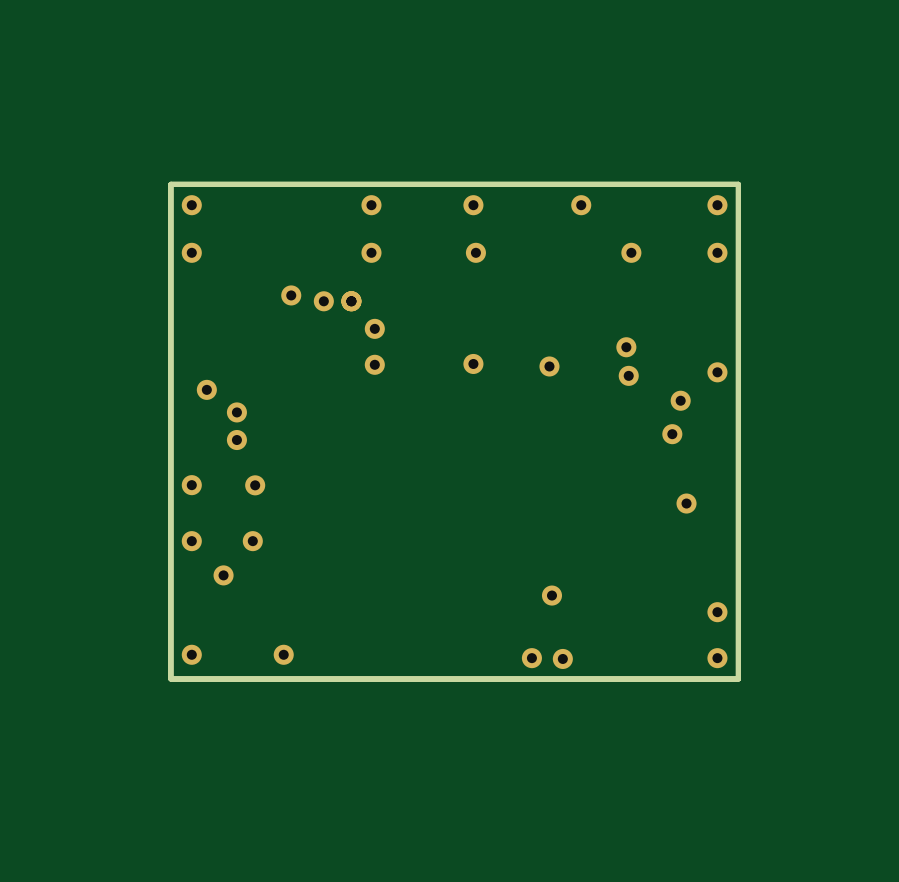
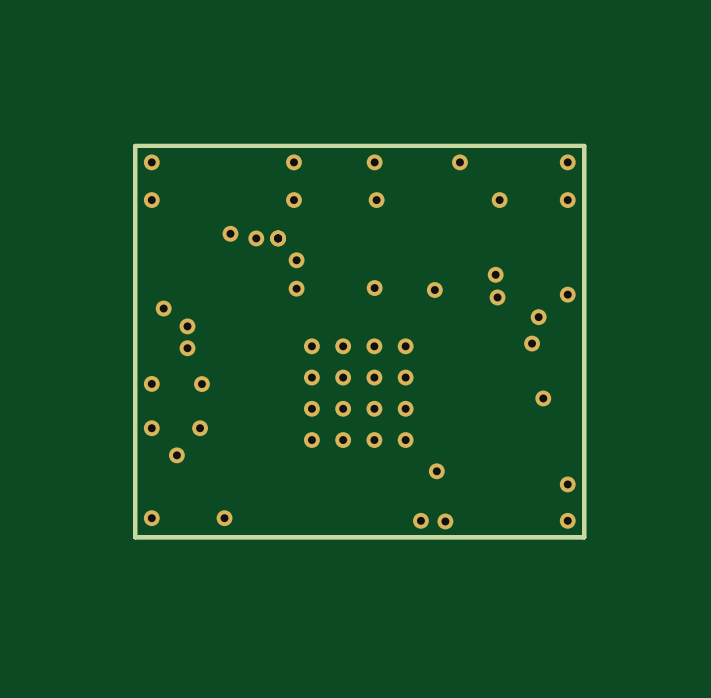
part: none -> (358, 393)

